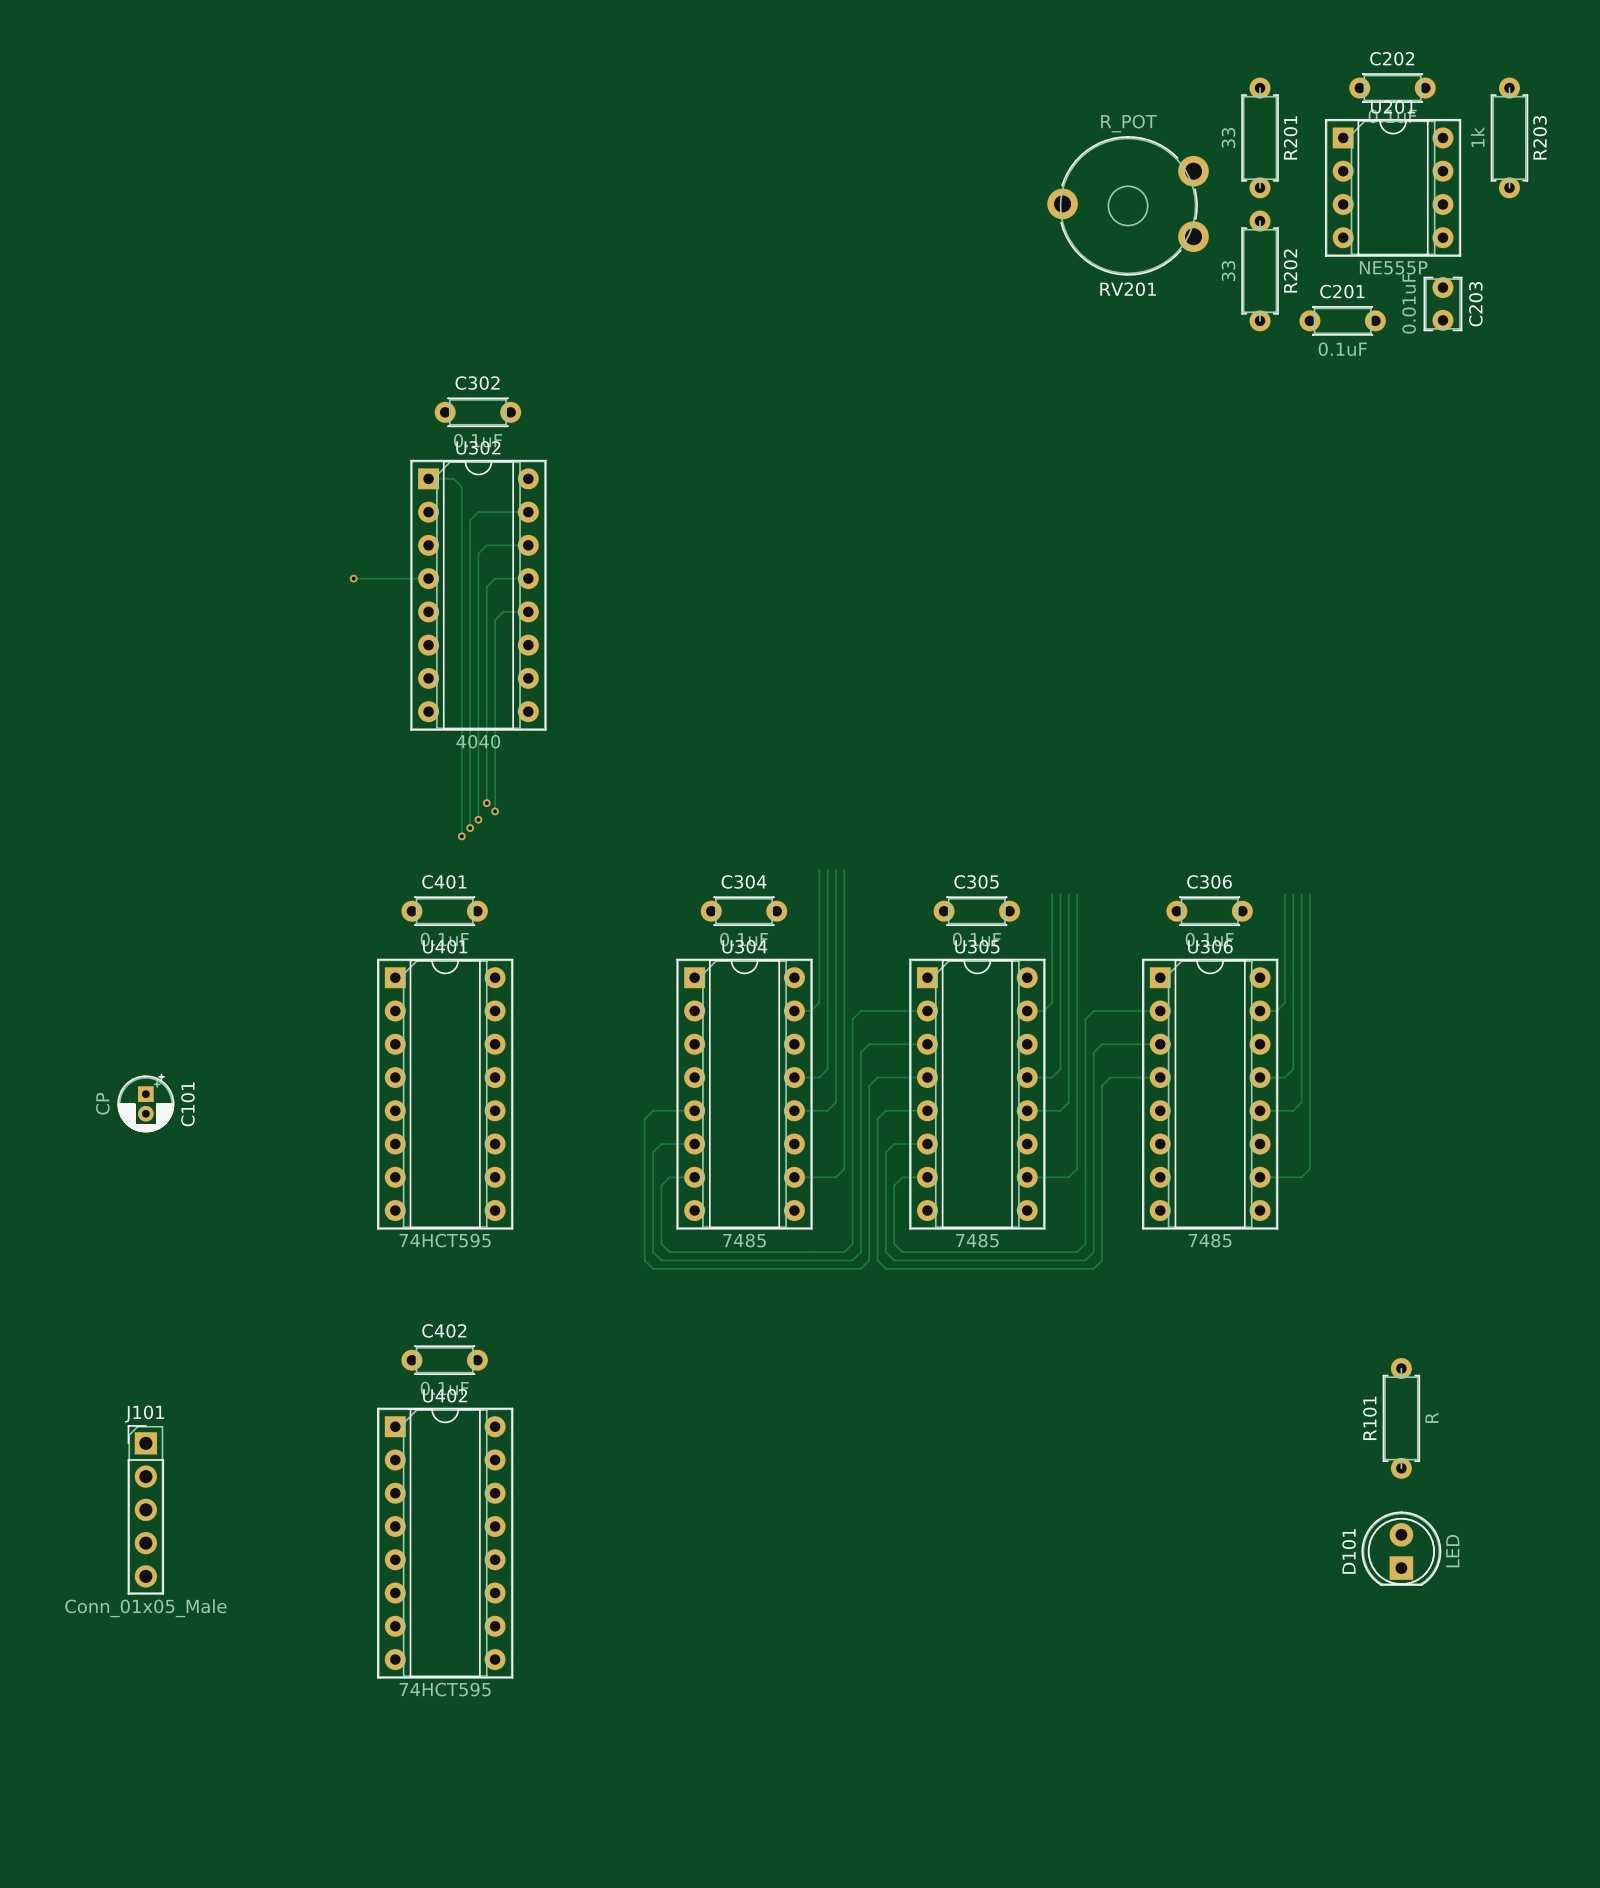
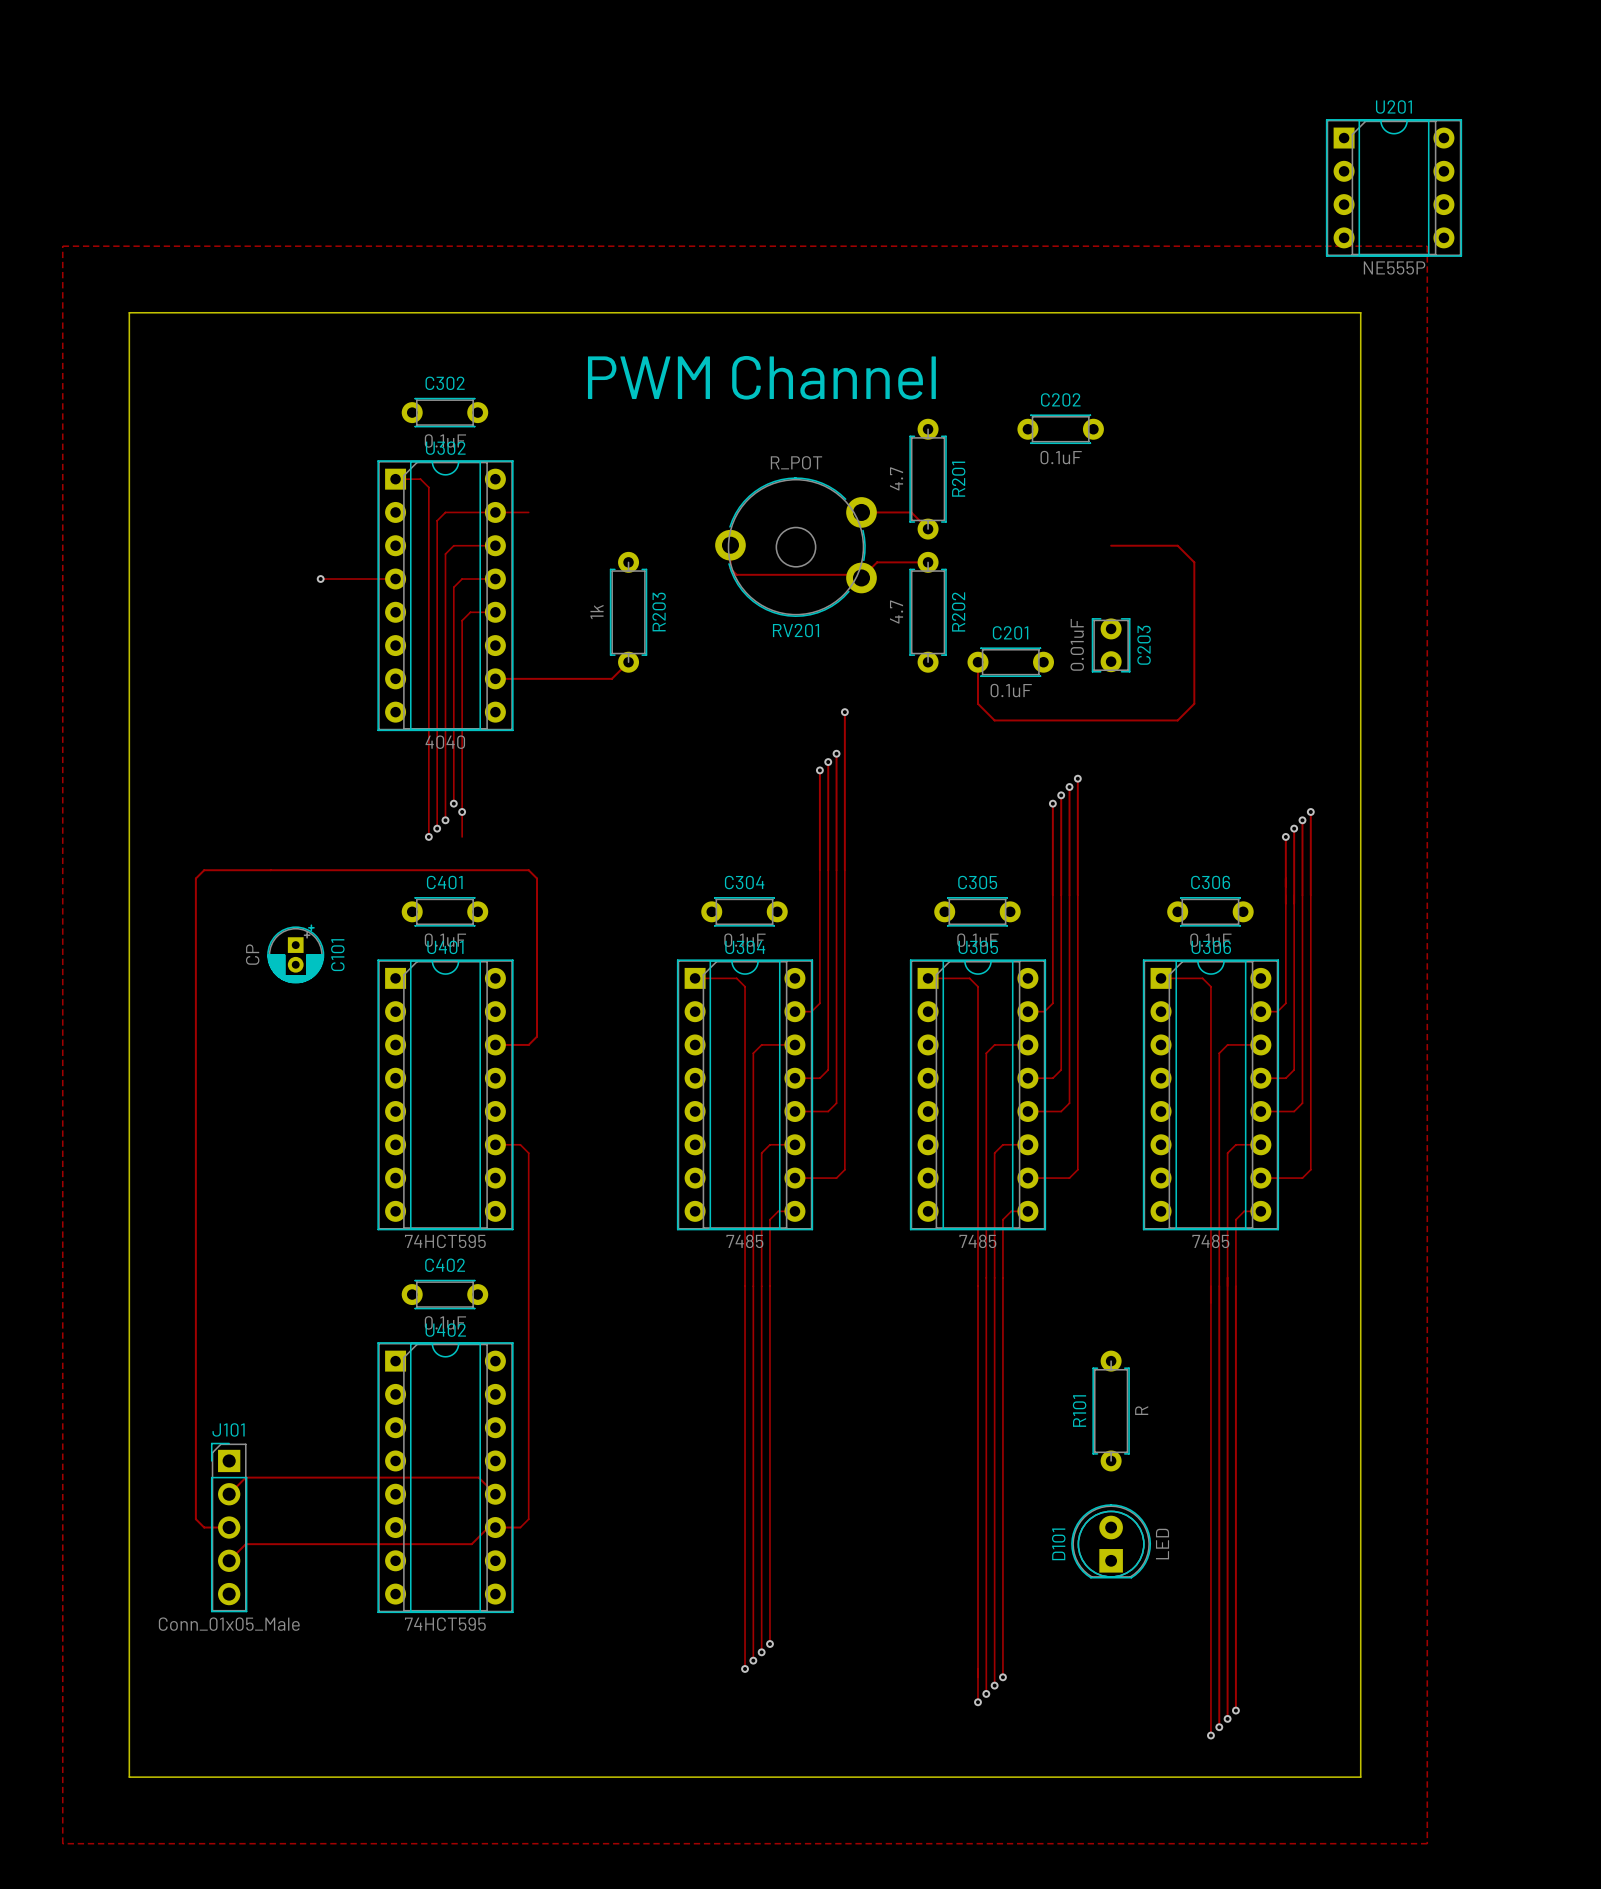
C202 position: (1392, 88) -> (1060, 429)
R201 value: 33 (1228, 137) -> 4.7 (896, 478)
R201 position: (1260, 137) -> (928, 479)
R203 position: (1509, 137) -> (628, 612)
RV201 position: (1128, 205) -> (795, 547)
zone outline: none -> (62, 246) (62, 1843) (1427, 1843) (1427, 246) (62, 246)
R202 position: (1260, 270) -> (928, 612)
R202 value: 33 (1228, 271) -> 4.7 (896, 612)
C203 position: (1442, 303) -> (1111, 645)
board edge: none -> (129, 312) (1360, 312) (1360, 1777) (129, 1777) (129, 312)
C201 position: (1342, 320) -> (1010, 662)
text: none -> PWM Channel (761, 377)
C302 position: (477, 412) -> (444, 412)
track: none -> (395, 479) (420, 479) (428, 487) (428, 836)
track: (428, 478) (453, 478) (461, 487) (461, 620) -> (495, 612) (470, 612) (462, 620)
track: (478, 512) (470, 520) (470, 828) -> (478, 512) (445, 512) (437, 520) (437, 828)
track: none -> (861, 512) (911, 512) (928, 529)
track: none -> (730, 545) (730, 568) (736, 574) (858, 574) (861, 577) (877, 562) (928, 562)
track: (486, 545) (478, 553) (478, 819) -> (487, 545) (453, 545) (445, 554) (445, 820)
track: (495, 545) (528, 545) -> none
track: none -> (1111, 545) (1177, 545) (1194, 562) (1194, 703) (1177, 720) (994, 720) (977, 703) (977, 662)
via position: (353, 578) -> (320, 579)
track: (395, 578) (428, 578) -> (320, 579) (353, 579)
track: (528, 578) (495, 578) (486, 586) (486, 803) -> (495, 579) (462, 579) (453, 587) (453, 803)
U302 position: (478, 595) -> (445, 595)
track: (528, 611) (503, 611) (495, 620) (495, 811) -> none
track: none -> (628, 662) (611, 678) (495, 678)
track: none -> (844, 712) (844, 870)
via: none -> (844, 712)
track: none -> (836, 753) (836, 870)
via: none -> (836, 753)
track: none -> (828, 762) (828, 870)
via: none -> (828, 762)
track: none -> (819, 770) (819, 870)
via: none -> (819, 770)
track: none -> (1077, 778) (1077, 895)
via: none -> (1077, 778)
track: none -> (1069, 787) (1069, 895)
via: none -> (1069, 787)
track: none -> (1061, 795) (1061, 895)
via: none -> (1061, 795)
via: none -> (453, 803)
via: (486, 803) -> none
track: none -> (1052, 803) (1052, 895)
via: none -> (1052, 803)
via: none -> (462, 811)
via: (495, 811) -> none
track: none -> (1310, 811) (1310, 895)
via: none -> (1310, 811)
via: none -> (445, 820)
via: (478, 819) -> none
track: none -> (1302, 820) (1302, 895)
via: none -> (1302, 820)
via: none -> (437, 828)
via: (470, 828) -> none
track: none -> (1294, 828) (1294, 903)
via: none -> (1294, 828)
via: none -> (428, 836)
via: (461, 836) -> none
track: none -> (1285, 836) (1285, 903)
via: none -> (1285, 836)
track: none -> (695, 978) (736, 978) (745, 986) (745, 1668)
track: none -> (928, 978) (969, 978) (977, 986) (977, 1702)
track: none -> (1161, 978) (1202, 978) (1210, 986) (1210, 1735)
track: (927, 1010) (860, 1010) (852, 1019) (852, 1243) (844, 1252) (669, 1252) (661, 1243) (661, 1185) (669, 1177) (694, 1177) -> none
track: (1160, 1010) (1093, 1010) (1085, 1019) (1085, 1243) (1077, 1252) (902, 1252) (894, 1243) (894, 1185) (902, 1177) (927, 1177) -> none
track: none -> (495, 1044) (528, 1044) (537, 1036) (537, 878) (528, 870) (204, 870) (195, 878) (195, 1519) (204, 1527) (229, 1527)
track: none -> (794, 1044) (761, 1044) (753, 1053) (753, 1660)
track: (927, 1044) (869, 1044) (860, 1052) (860, 1252) (852, 1260) (661, 1260) (653, 1252) (653, 1152) (661, 1144) (694, 1144) -> none
track: none -> (1027, 1044) (994, 1044) (986, 1053) (986, 1693)
track: (1160, 1044) (1102, 1044) (1093, 1052) (1093, 1252) (1085, 1260) (894, 1260) (885, 1252) (885, 1152) (894, 1144) (927, 1144) -> none
track: none -> (1260, 1044) (1227, 1044) (1219, 1053) (1219, 1727)
track: (927, 1077) (877, 1077) (869, 1085) (869, 1260) (860, 1268) (653, 1268) (644, 1260) (644, 1119) (653, 1110) (694, 1110) -> none
track: (1160, 1077) (1110, 1077) (1102, 1085) (1102, 1260) (1093, 1268) (885, 1268) (877, 1260) (877, 1119) (885, 1110) (927, 1110) -> none
C101 position: (145, 1102) -> (295, 953)
track: none -> (495, 1144) (520, 1144) (528, 1153) (528, 1519) (520, 1527) (488, 1527) (471, 1544) (245, 1544) (229, 1560)
track: none -> (794, 1144) (769, 1144) (761, 1153) (761, 1652)
track: none -> (1027, 1144) (1002, 1144) (994, 1153) (994, 1685)
track: none -> (1260, 1144) (1235, 1144) (1227, 1153) (1227, 1286)
track: none -> (794, 1211) (778, 1211) (769, 1219) (769, 1644)
track: none -> (1027, 1211) (1011, 1211) (1002, 1219) (1002, 1677)
track: none -> (1260, 1211) (1244, 1211) (1235, 1219) (1235, 1710)
track: none -> (1227, 1277) (1227, 1718)
C402 position: (444, 1360) -> (444, 1294)
R101 position: (1401, 1418) -> (1111, 1411)
track: none -> (229, 1494) (245, 1477) (478, 1477) (495, 1494)
J101 position: (145, 1509) -> (229, 1527)
U402 position: (445, 1543) -> (445, 1477)
D101 position: (1401, 1548) -> (1111, 1541)
via: none -> (769, 1644)
via: none -> (761, 1652)
via: none -> (753, 1660)
via: none -> (745, 1668)
via: none -> (1002, 1677)
via: none -> (994, 1685)
via: none -> (986, 1693)
via: none -> (977, 1702)
via: none -> (1235, 1710)
via: none -> (1227, 1718)
via: none -> (1219, 1727)
via: none -> (1210, 1735)

